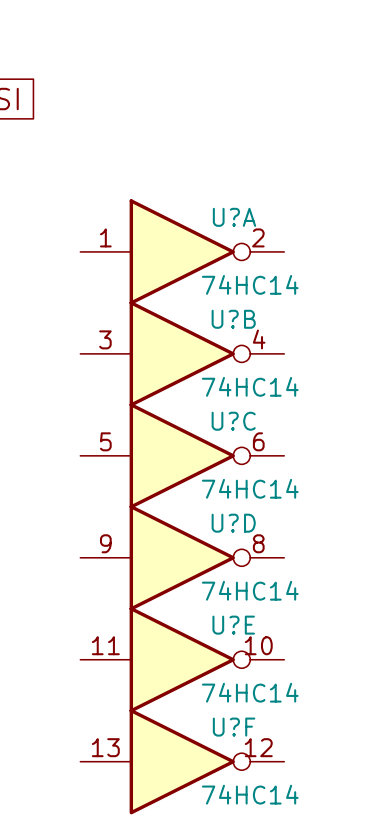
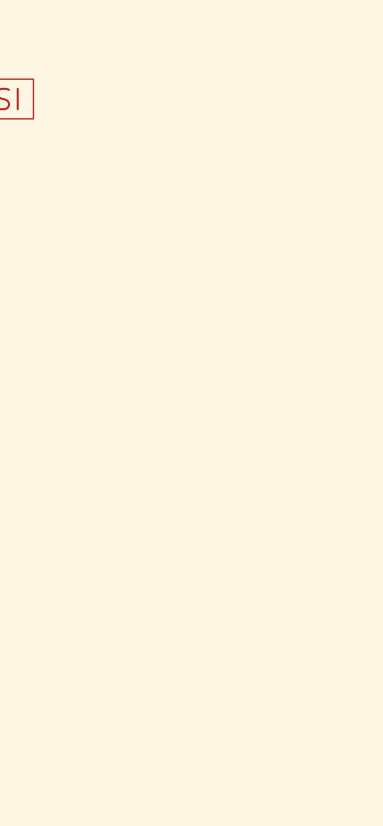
U?A: 74HC14 (182, 251) -> none
U?B: 74HC14 (182, 353) -> none
U?C: 74HC14 (182, 455) -> none
U?D: 74HC14 (182, 557) -> none
U?E: 74HC14 (182, 659) -> none
U?F: 74HC14 (182, 761) -> none

